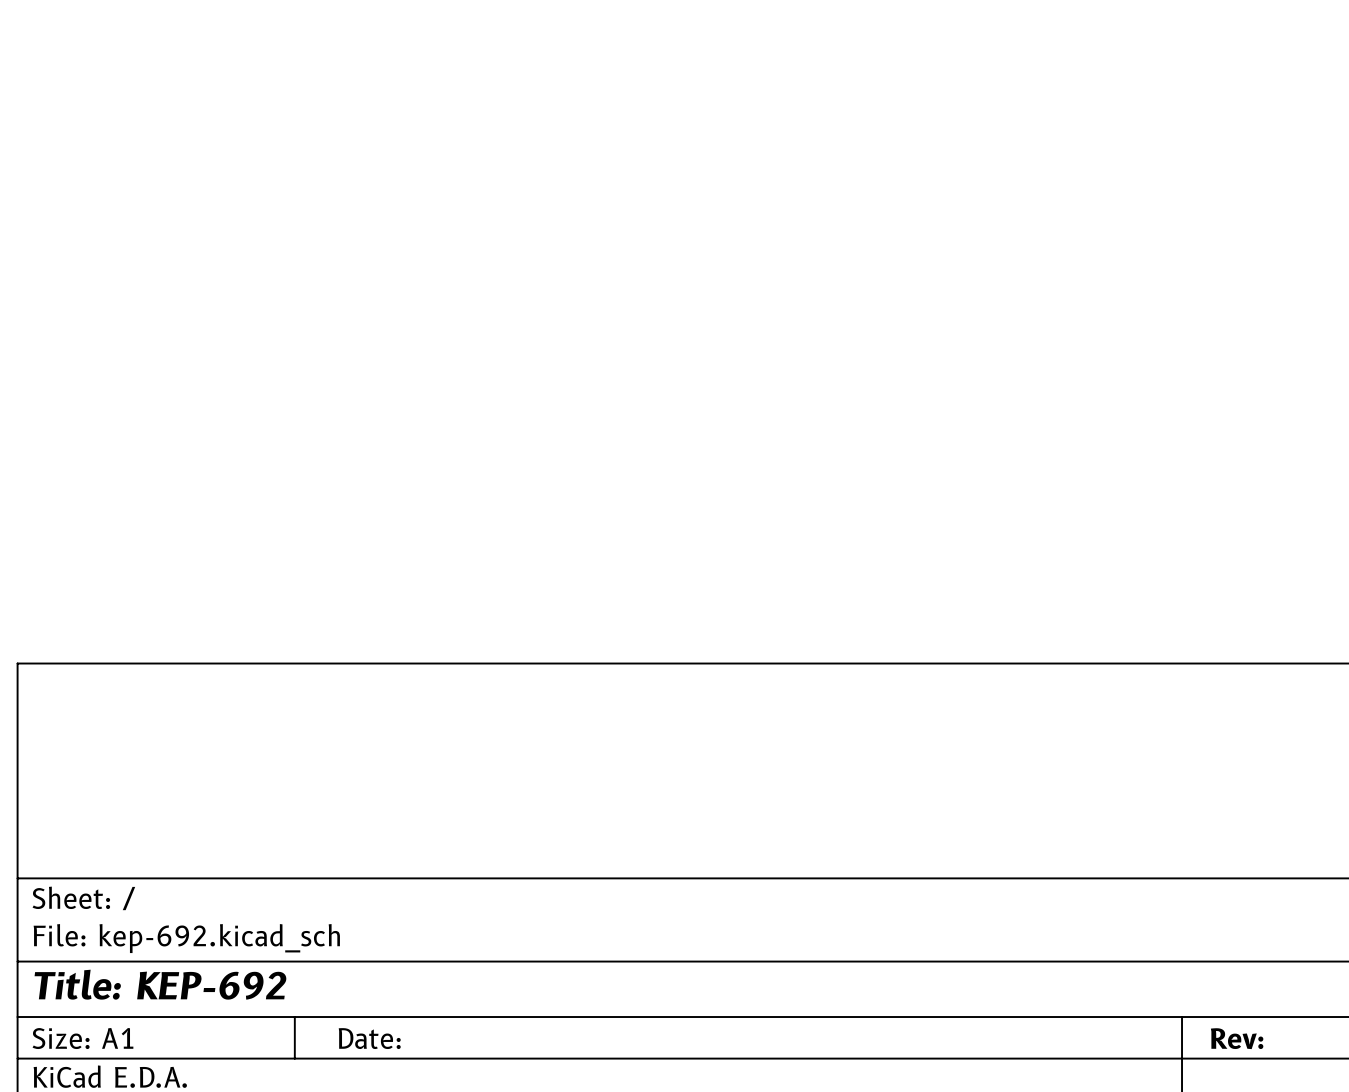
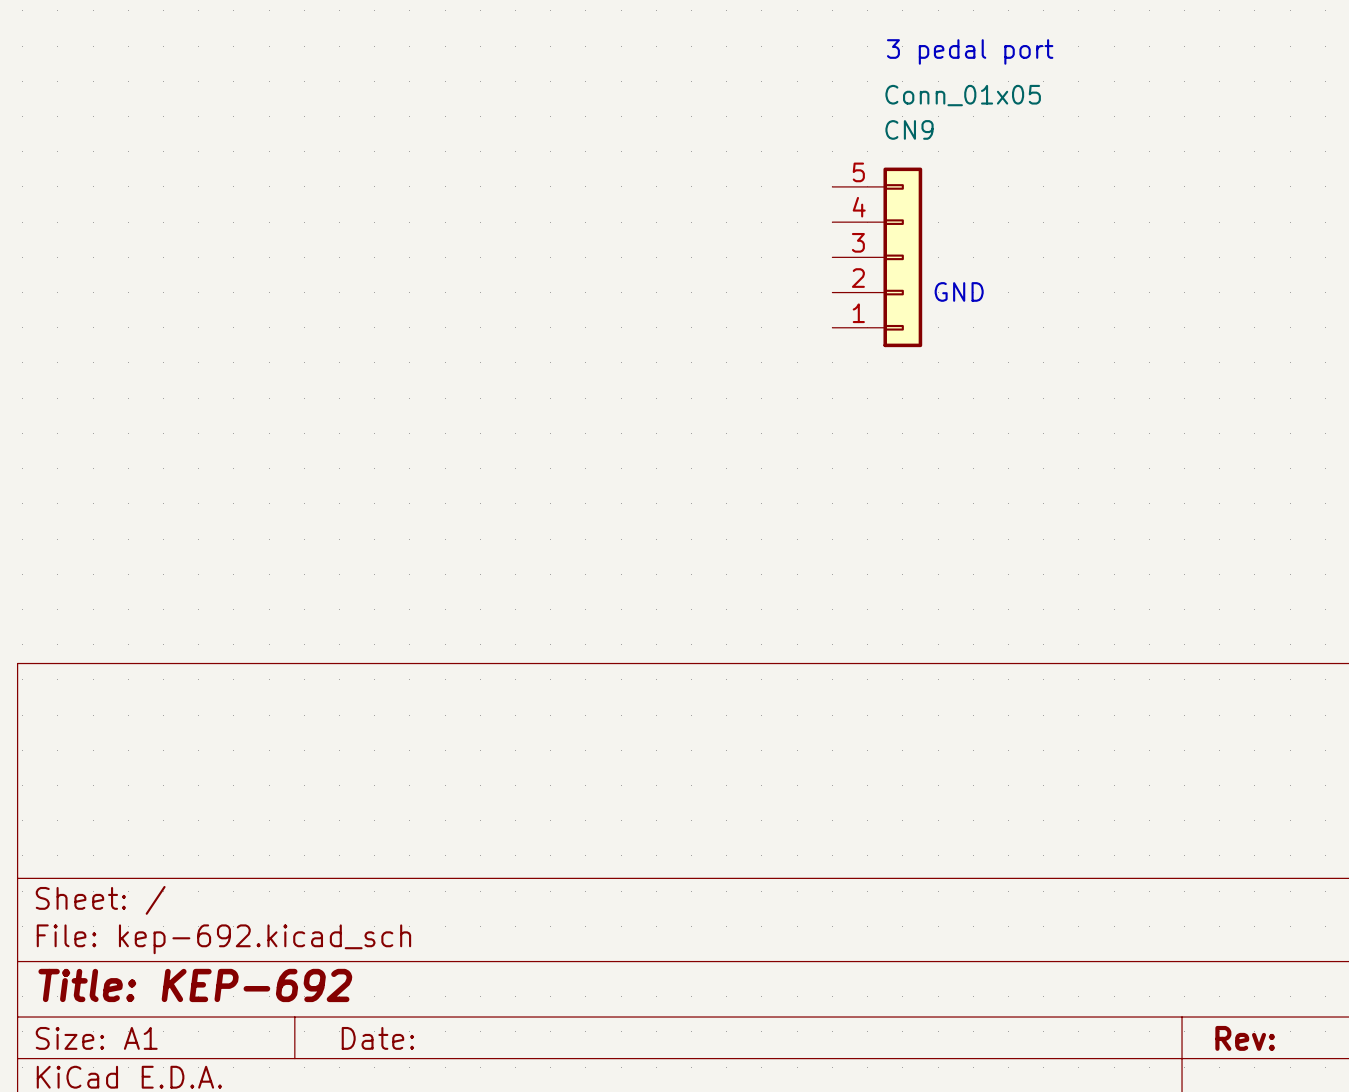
text: none -> 3 pedal port (970, 51)
CN9: none -> Conn_01x05 (877, 257)
text: none -> GND (959, 291)

